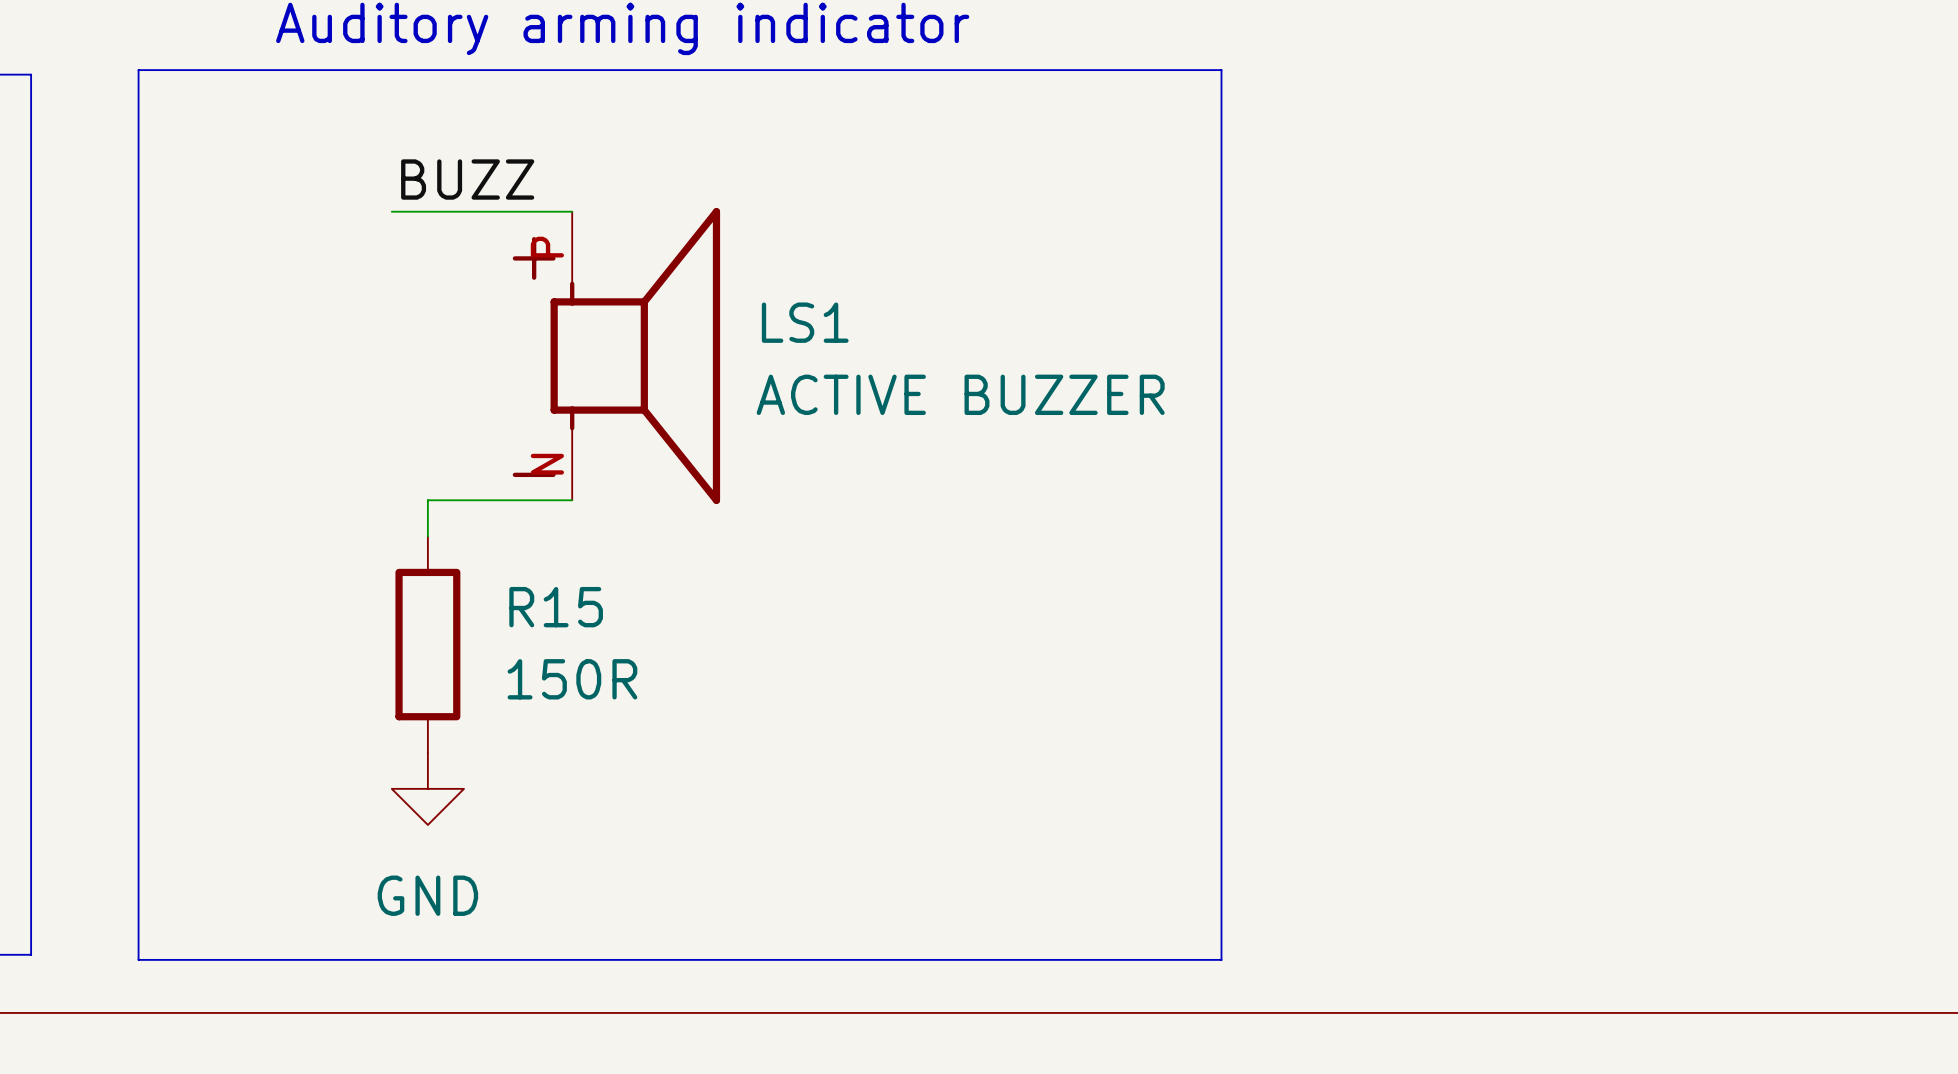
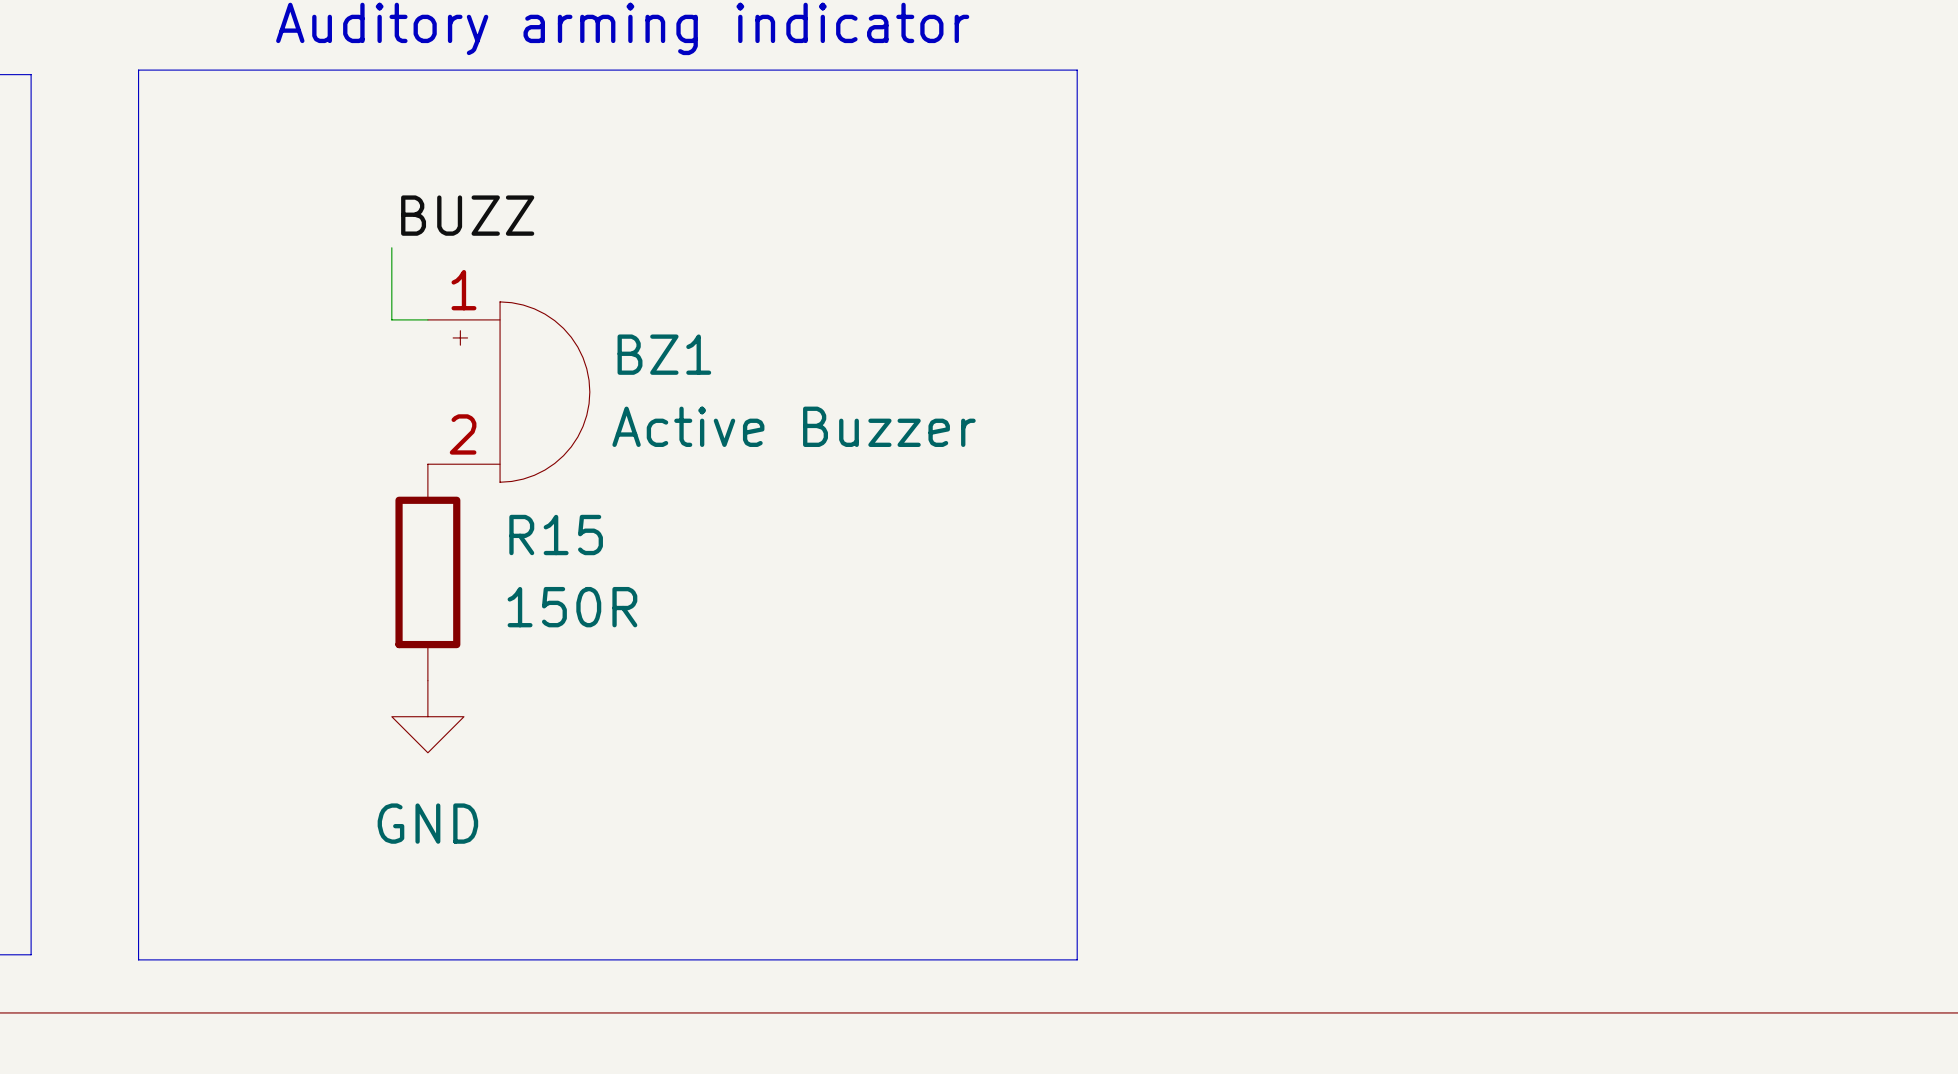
line: (1077, 70) (1221, 70) (1221, 959) (1077, 959) -> (1077, 70) (1077, 959)
label position: BUZZ (467, 179) -> BUZZ (467, 215)
wire: (391, 211) (572, 211) -> none
wire: none -> (391, 247) (391, 319) (427, 319)
LS1: ACTIVE BUZZER (635, 356) -> none
BZ1: none -> Active Buzzer (508, 392)
wire: (572, 500) (427, 500) (427, 536) -> none
R15 position: (427, 644) -> (427, 572)
power symbol position: GND (427, 788) -> GND (427, 716)

